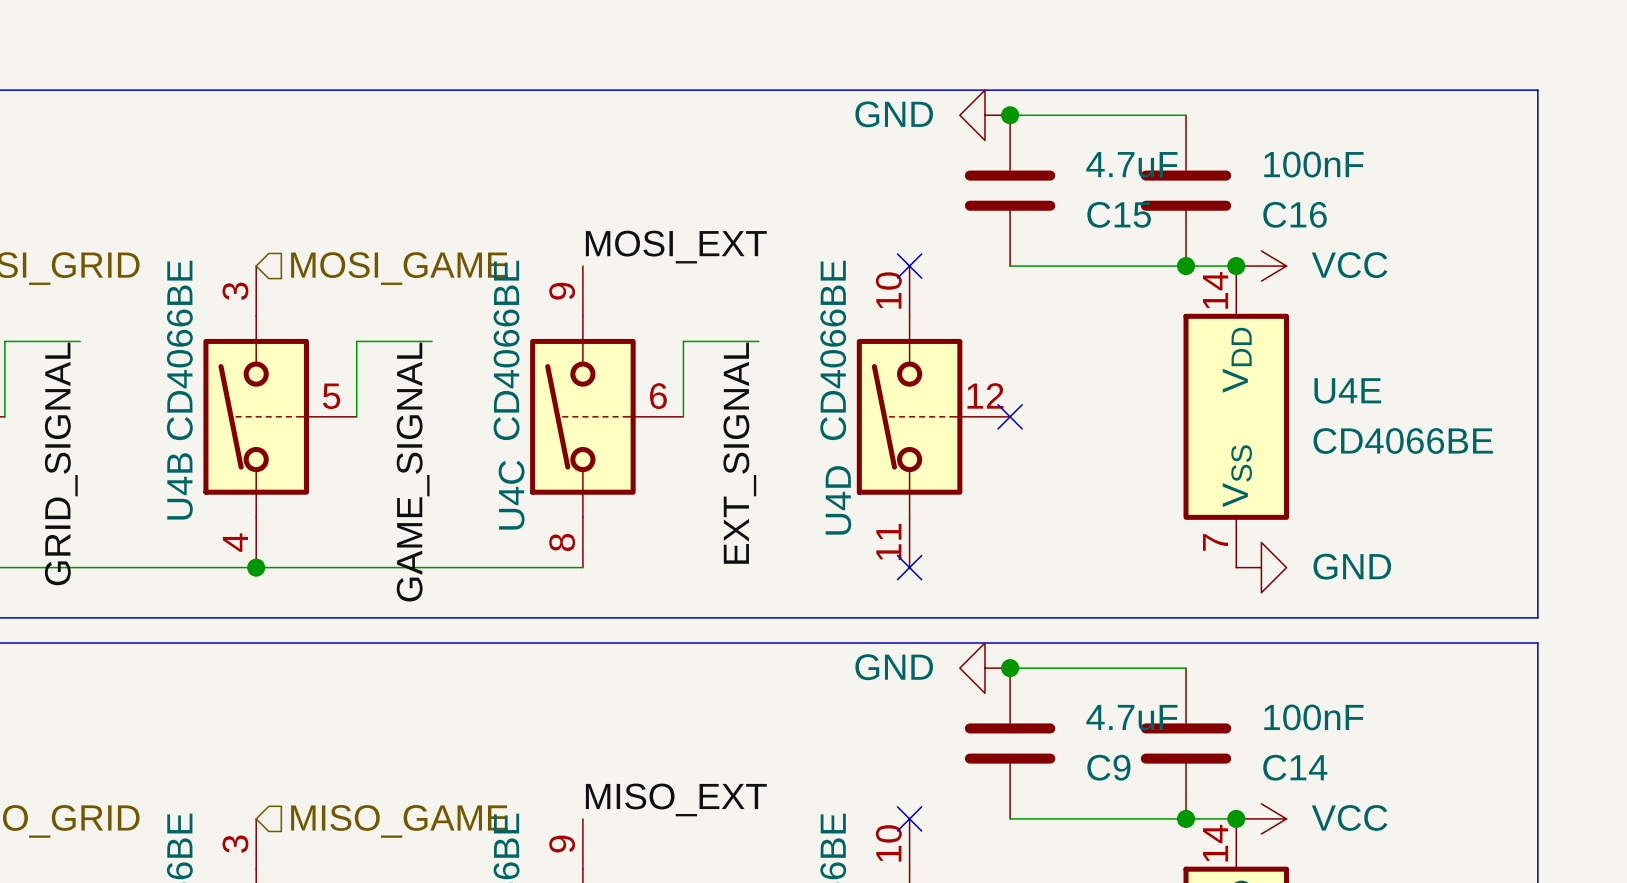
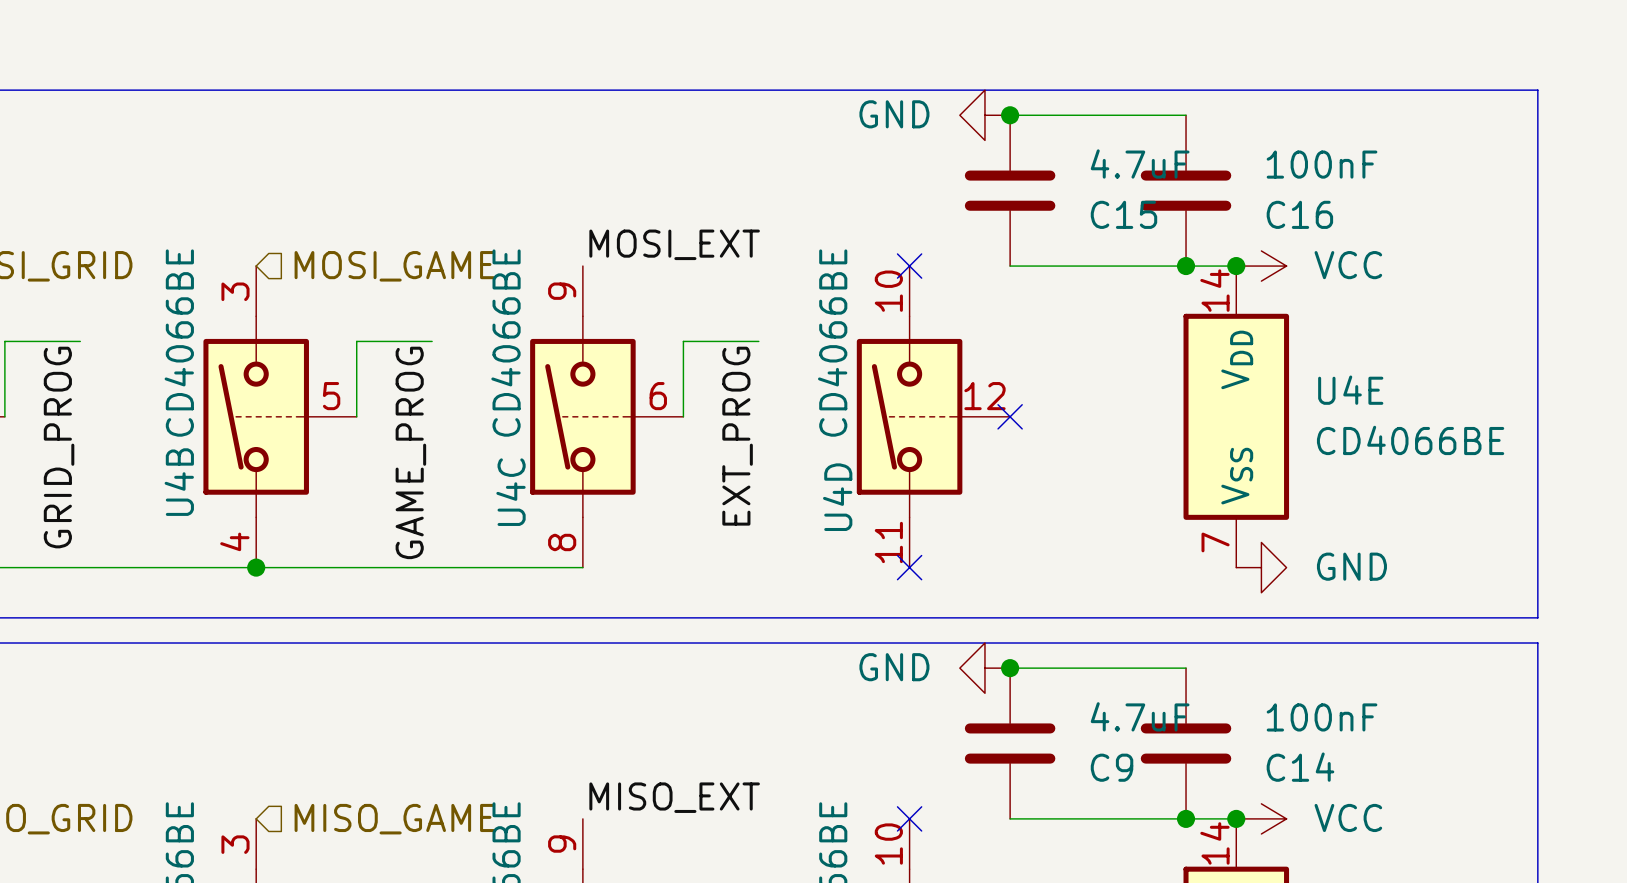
label: EXT_SIGNAL (739, 453) -> EXT_PROG (737, 436)
label: GRID_SIGNAL (61, 463) -> GRID_PROG (59, 447)
label: GAME_SIGNAL (413, 472) -> GAME_PROG (410, 452)

